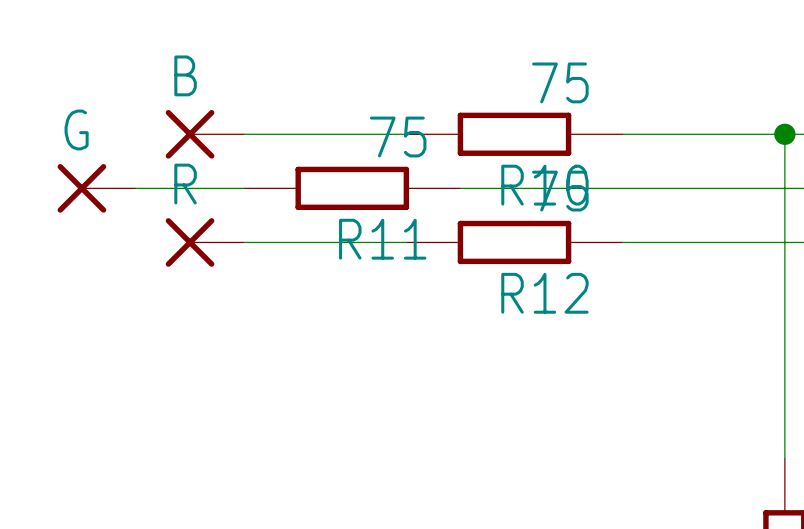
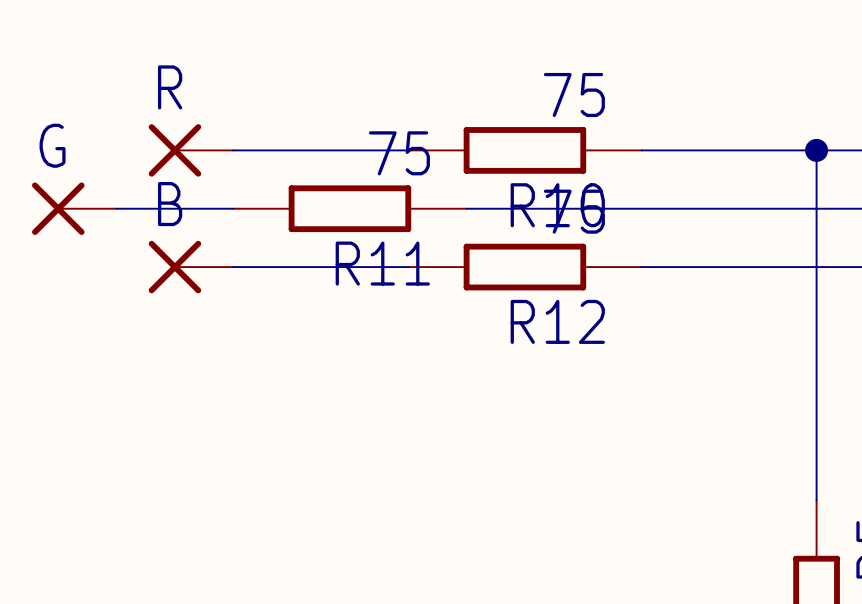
B name: B (185, 75) -> R (170, 87)
R name: R (185, 184) -> B (170, 204)

